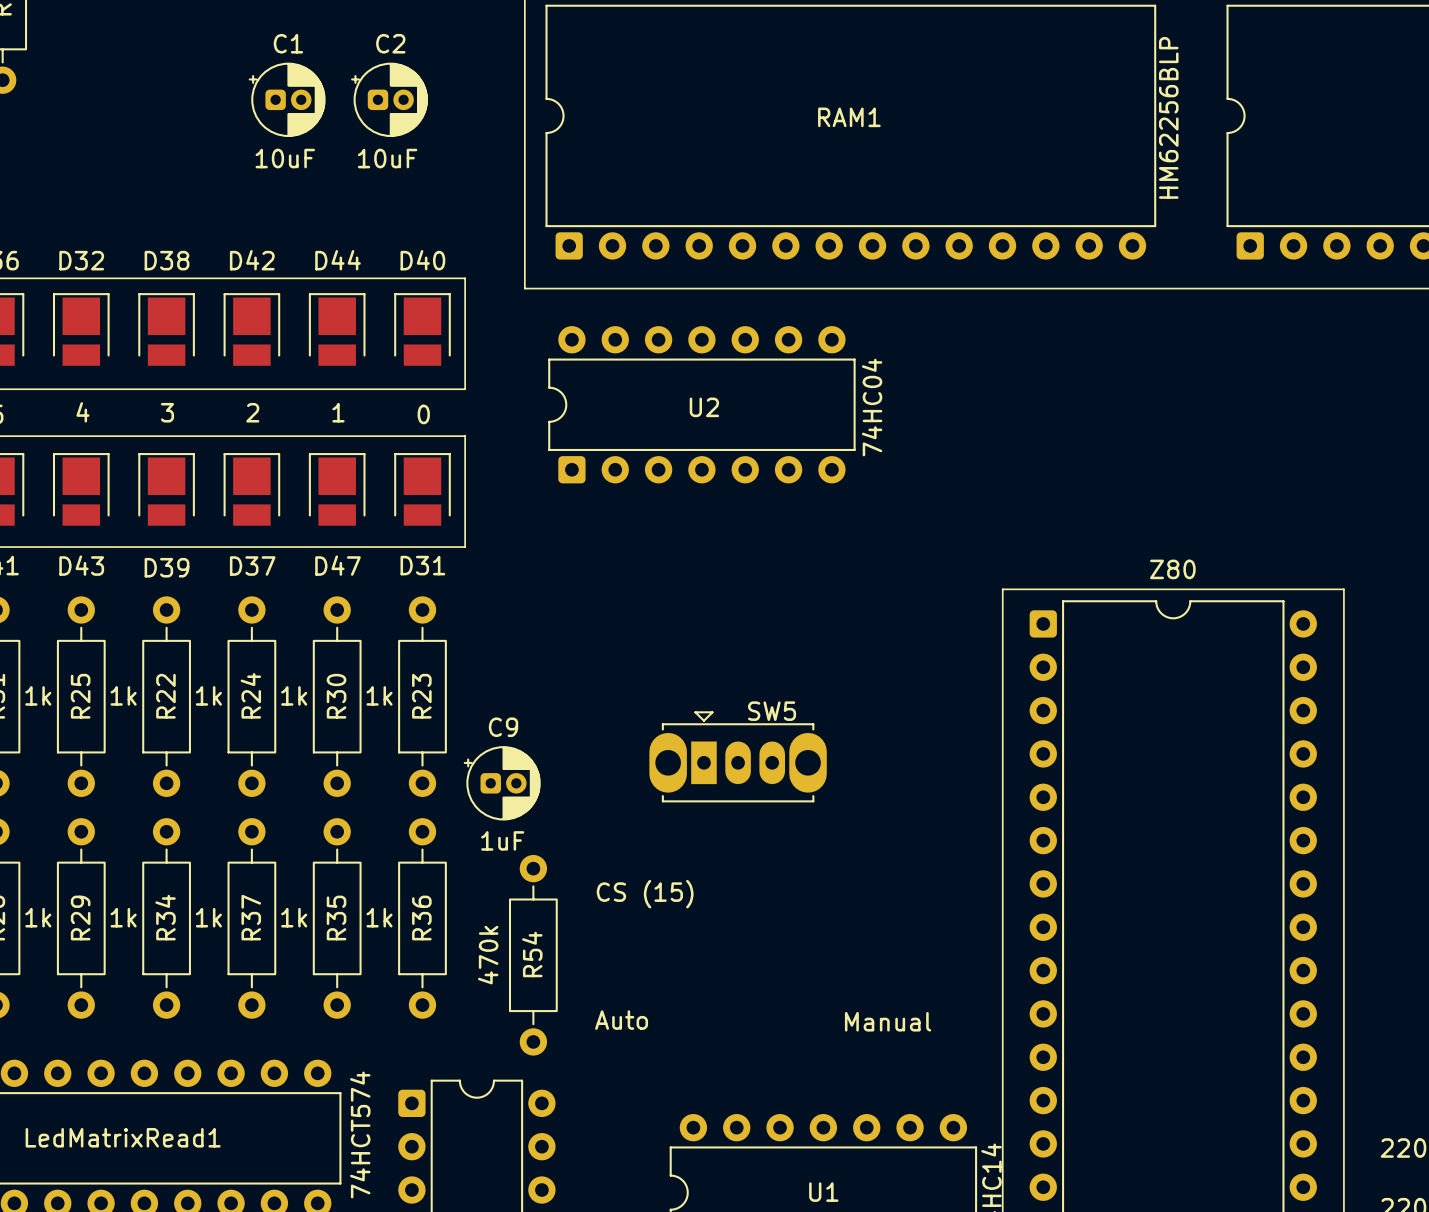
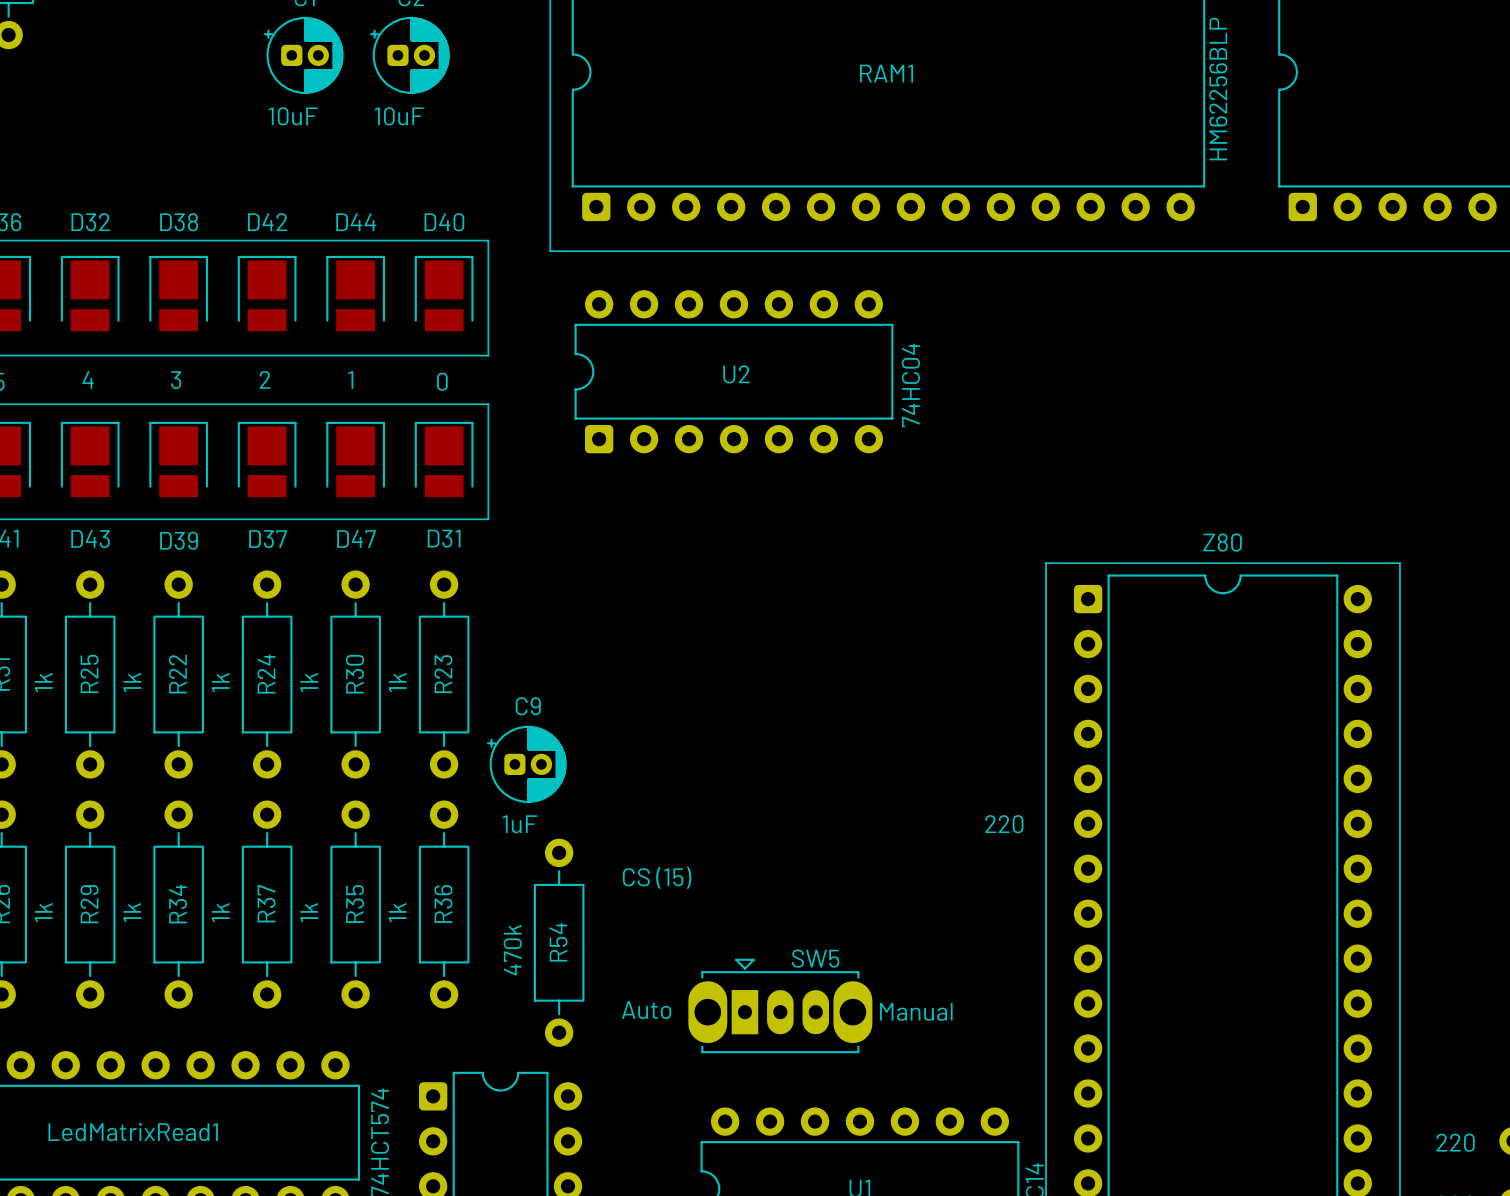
text rotation: 0° (38, 695) -> 90° counterclockwise (43, 682)
text rotation: 0° (123, 695) -> 90° counterclockwise (132, 682)
text rotation: 0° (208, 695) -> 90° counterclockwise (220, 682)
text rotation: 0° (294, 695) -> 90° counterclockwise (309, 682)
text rotation: 0° (379, 695) -> 90° counterclockwise (397, 682)
SW5 position: (738, 756) -> (780, 1005)
text: none -> 220 (1004, 824)
text rotation: 0° (38, 917) -> 90° counterclockwise (43, 912)
text rotation: 0° (123, 917) -> 90° counterclockwise (132, 912)
text rotation: 0° (208, 917) -> 90° counterclockwise (220, 912)
text rotation: 0° (294, 917) -> 90° counterclockwise (309, 912)
text rotation: 0° (379, 917) -> 90° counterclockwise (397, 912)

